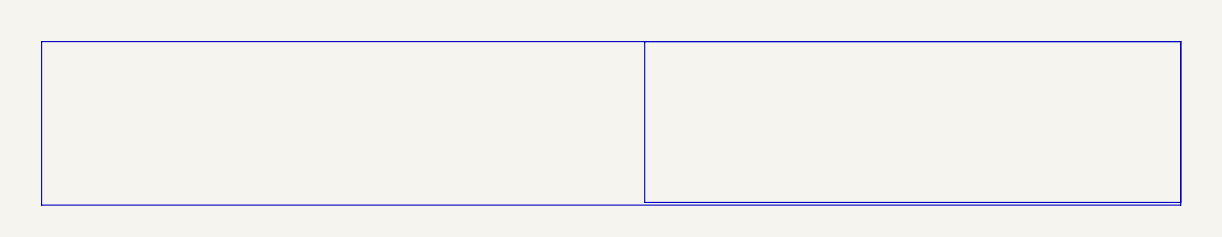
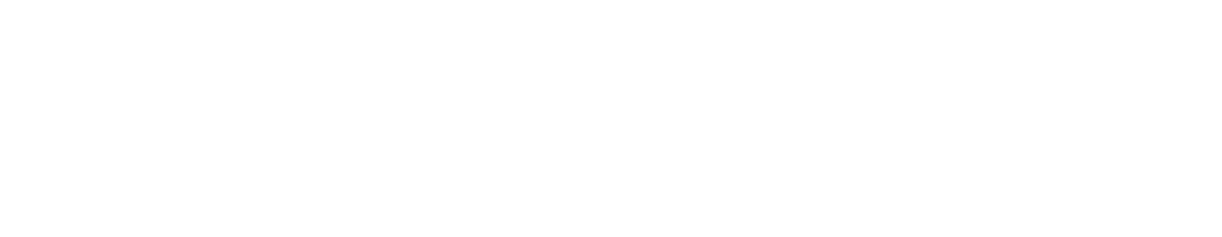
line: (41, 41) (1180, 41) (1180, 205) (41, 205) (41, 41) -> none
line: (644, 41) (644, 202) (1180, 202) -> none

